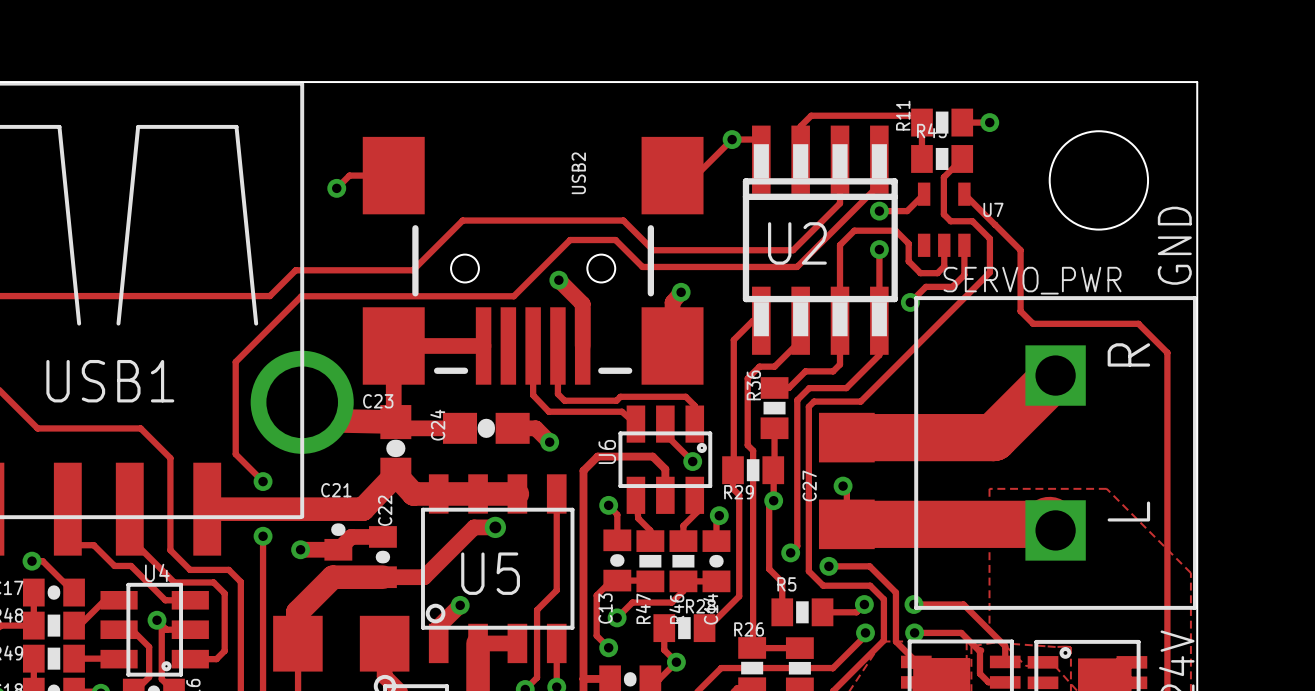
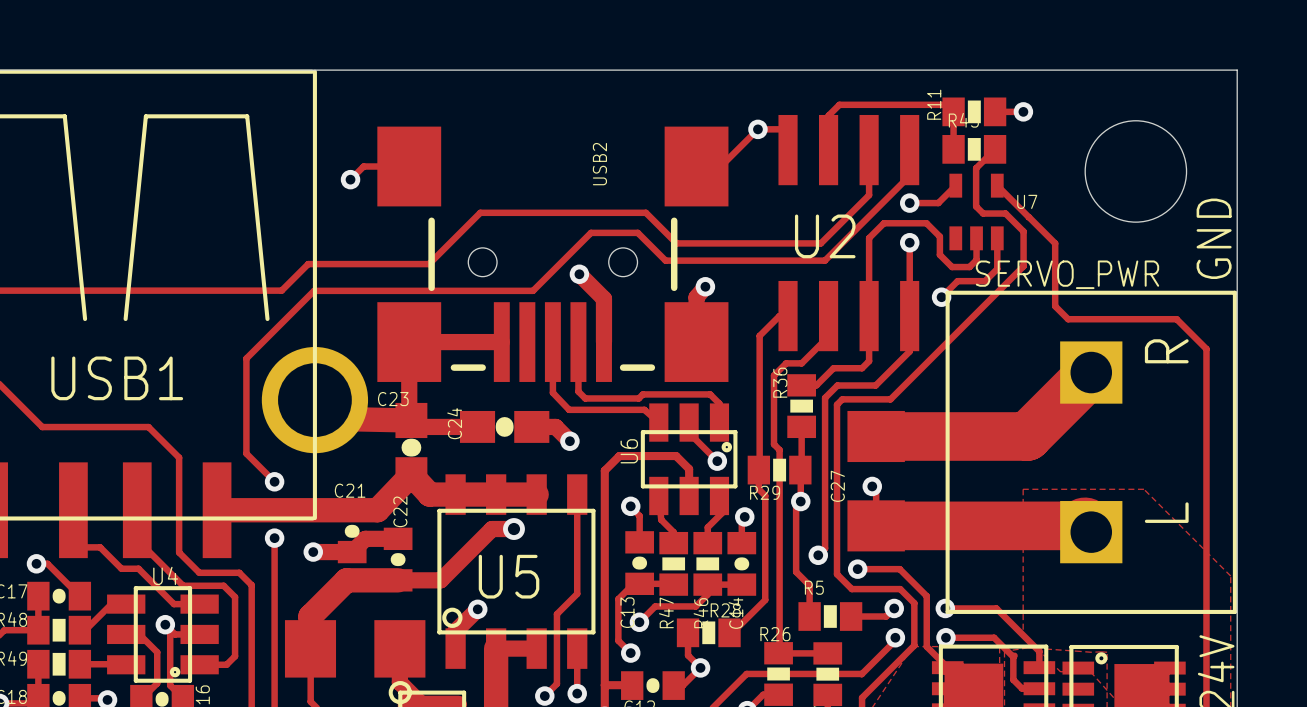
U2 footprint: [742, 125, 898, 355] -> [778, 114, 920, 352]

